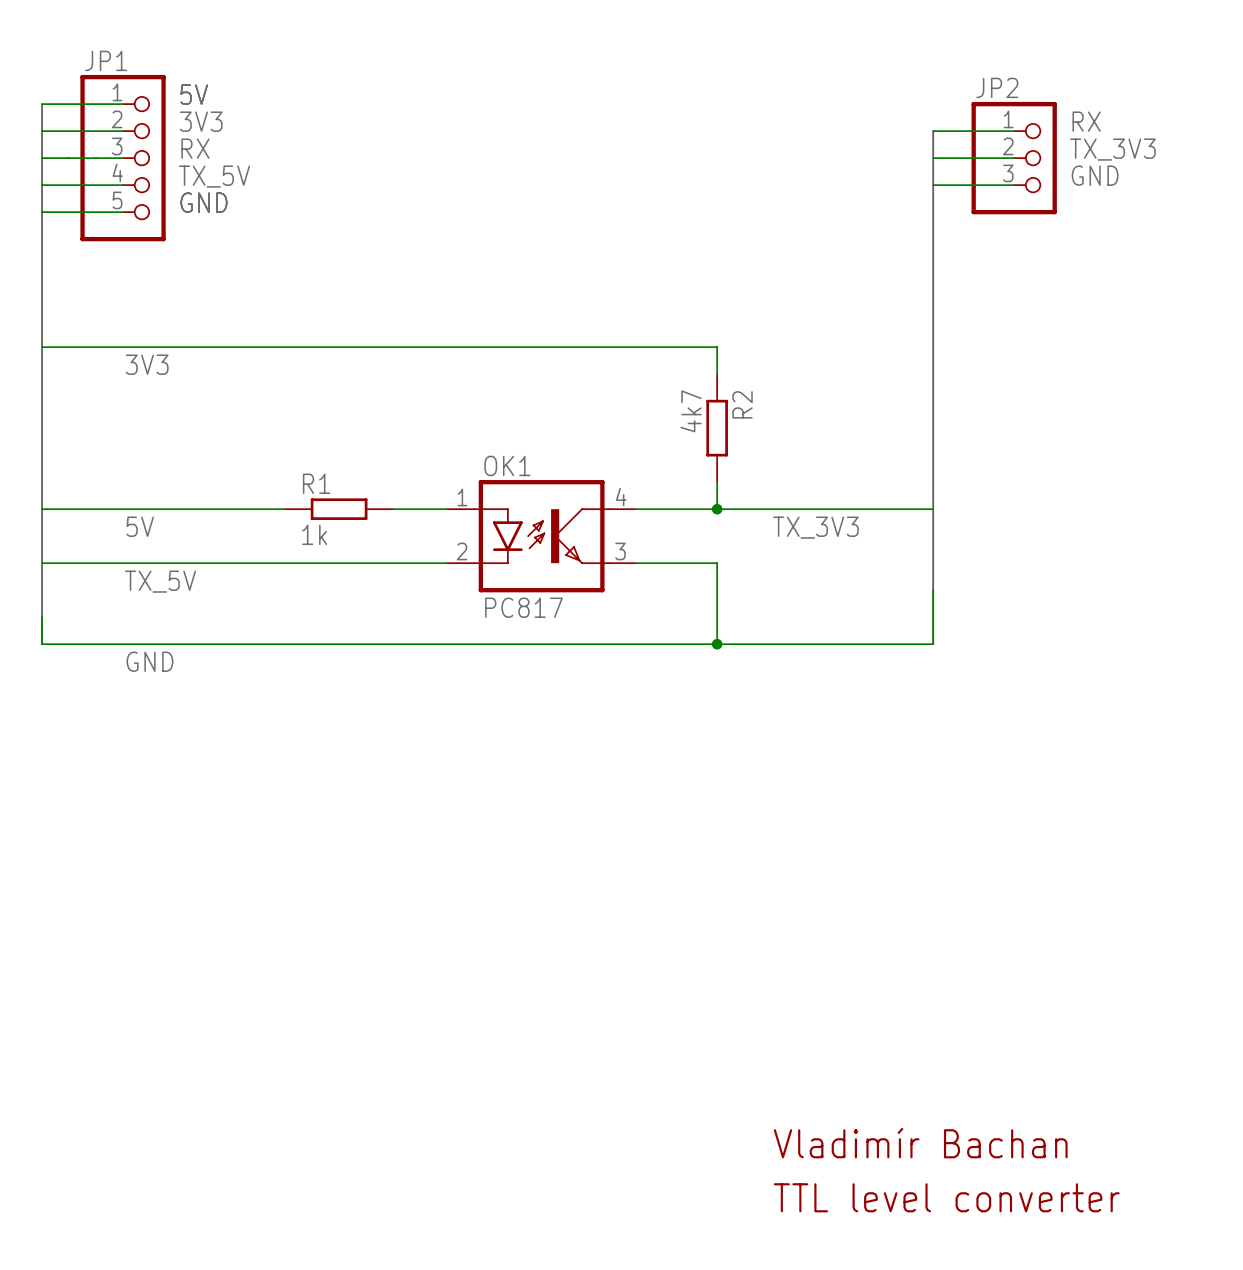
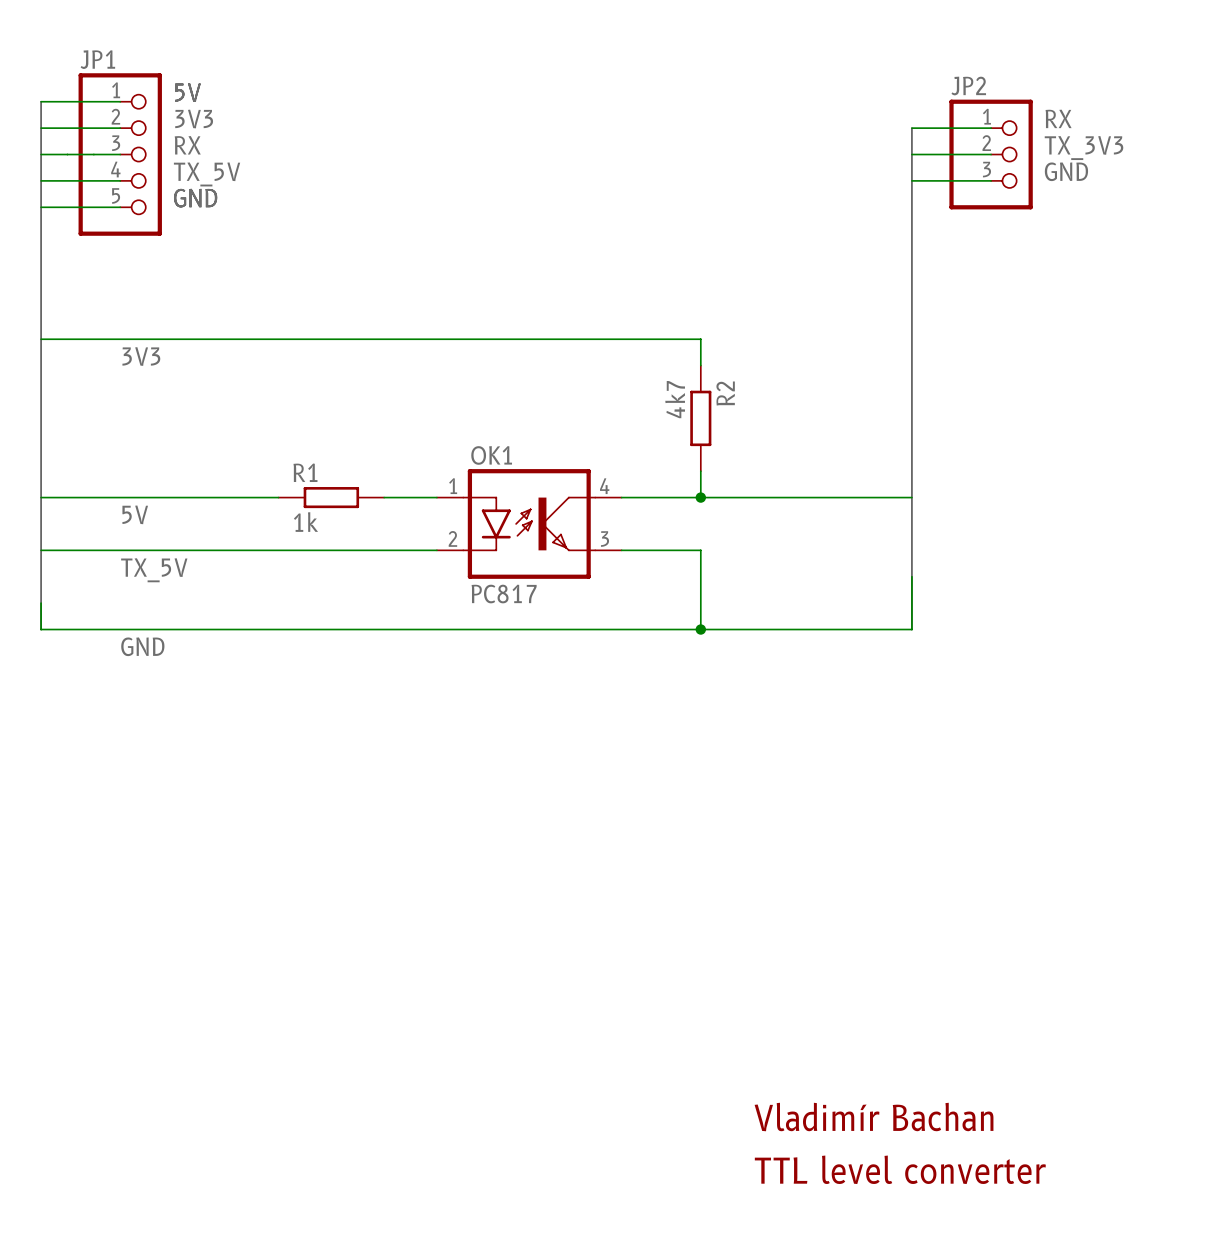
label: TX_3V3 (815, 527) -> none

